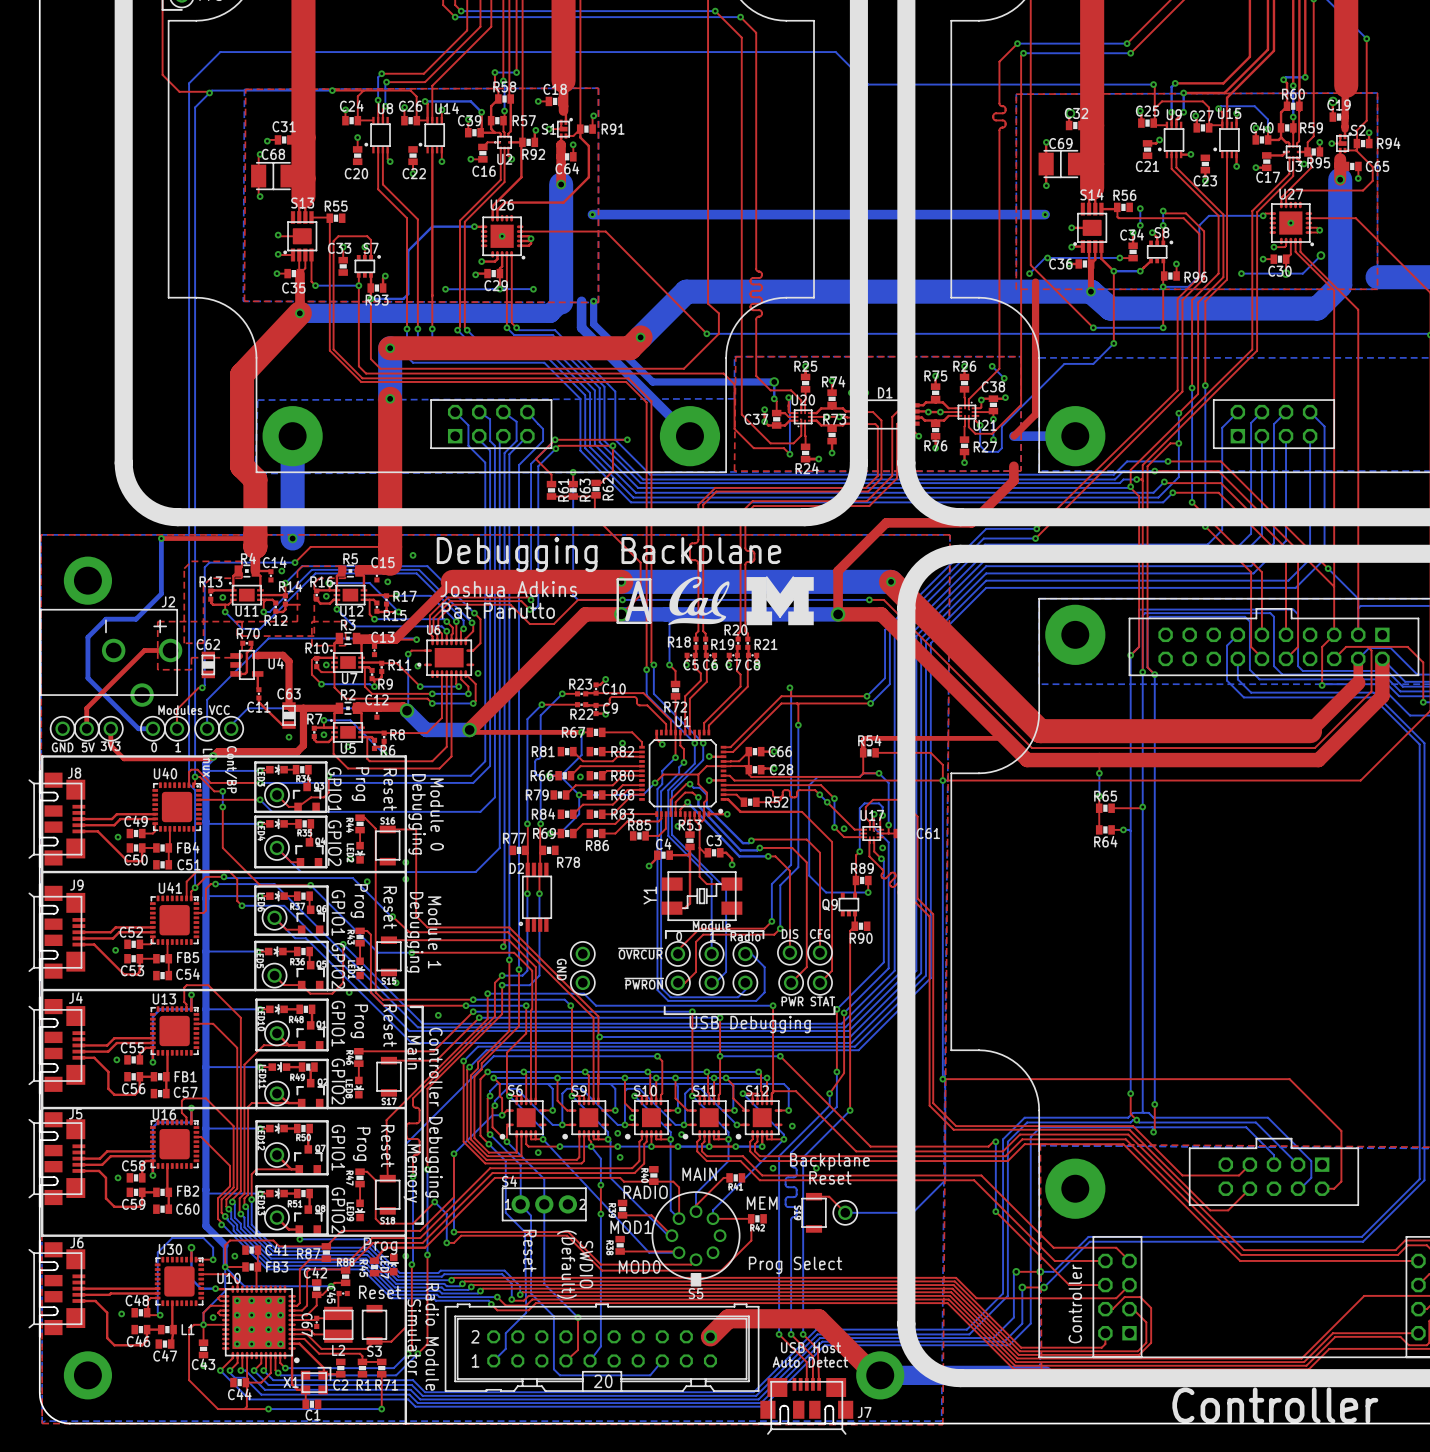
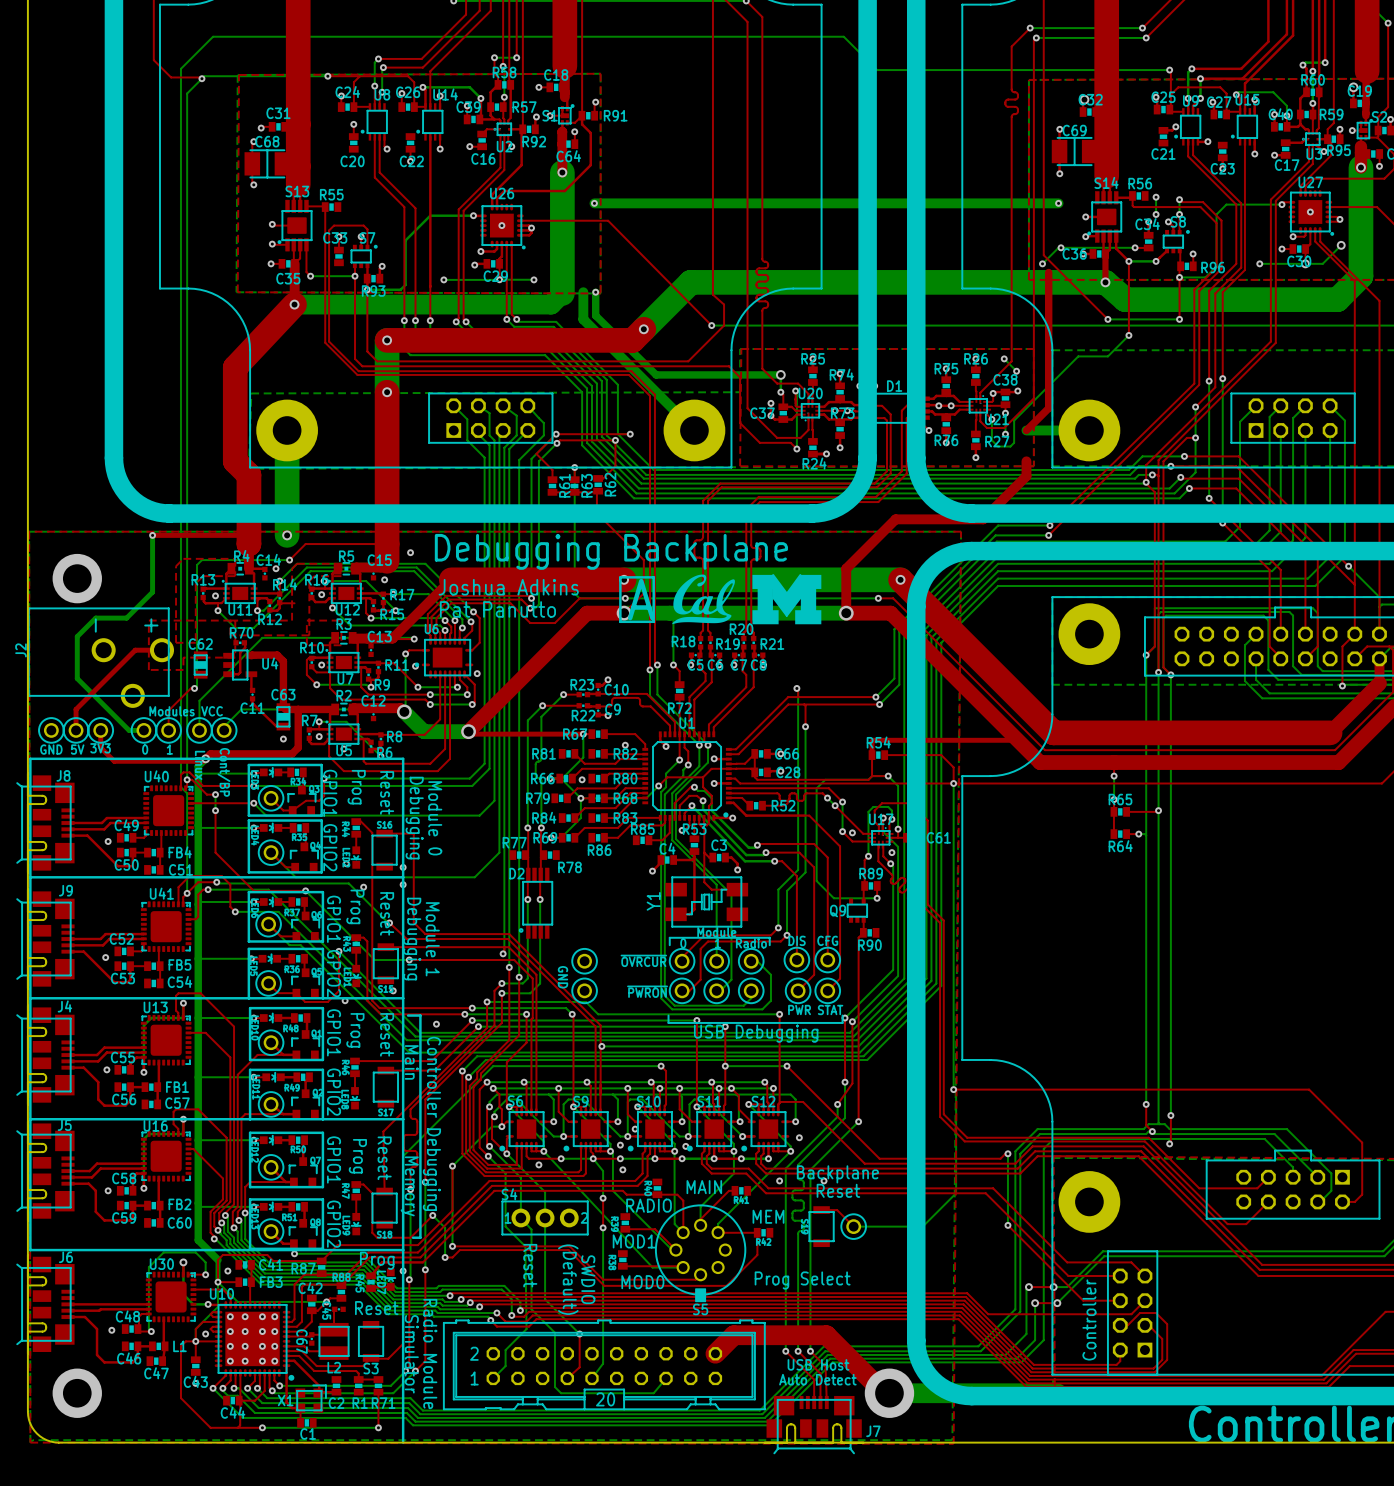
J2 name rotation: 0° (168, 601) -> 90° counterclockwise (20, 650)
J2 name position: J2 (168, 601) -> J2 (20, 650)

